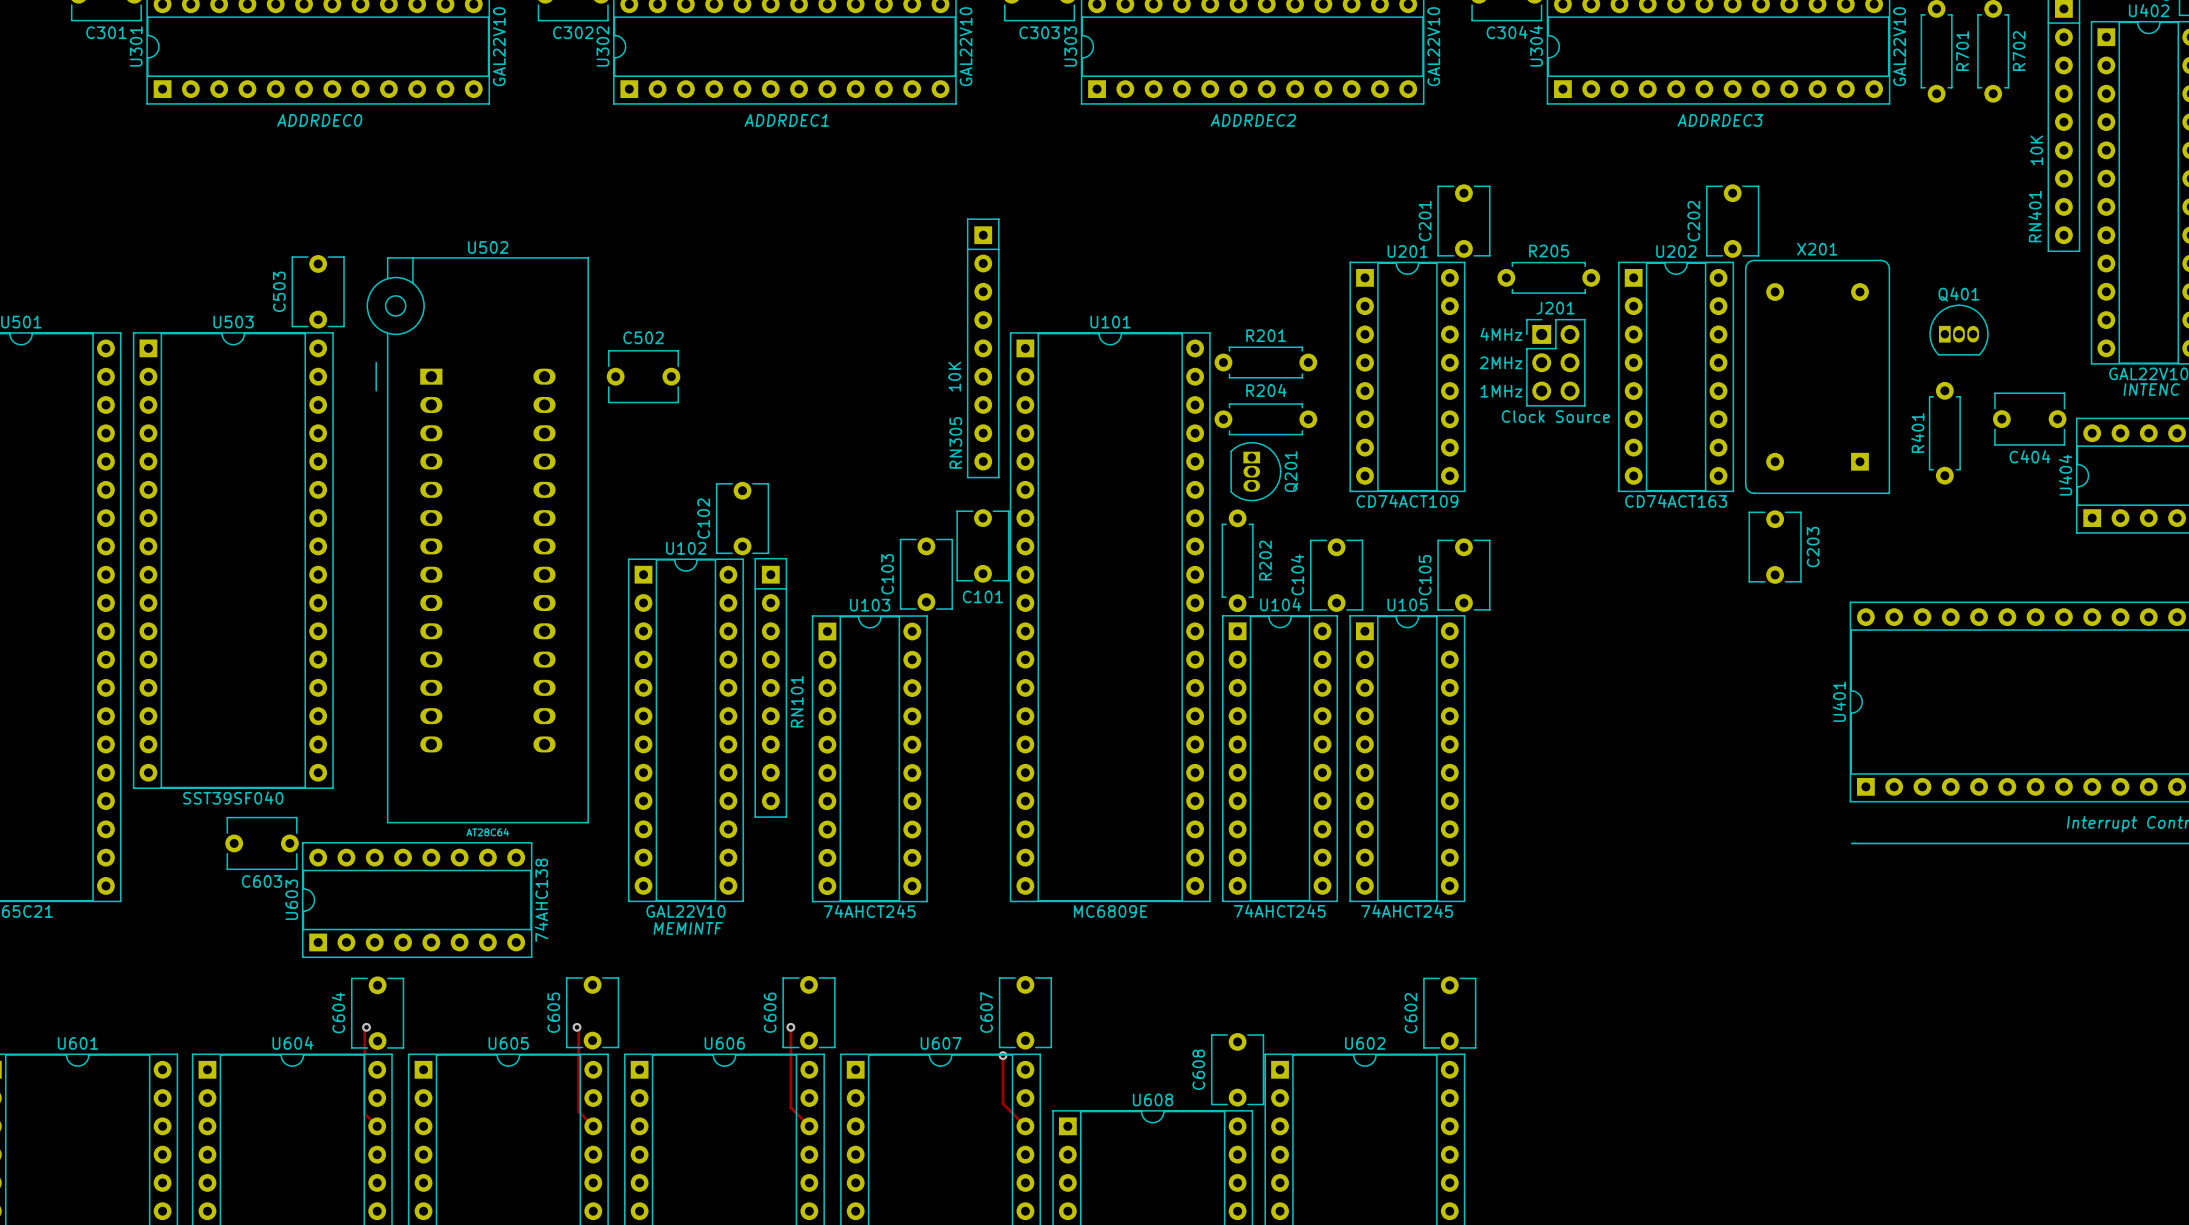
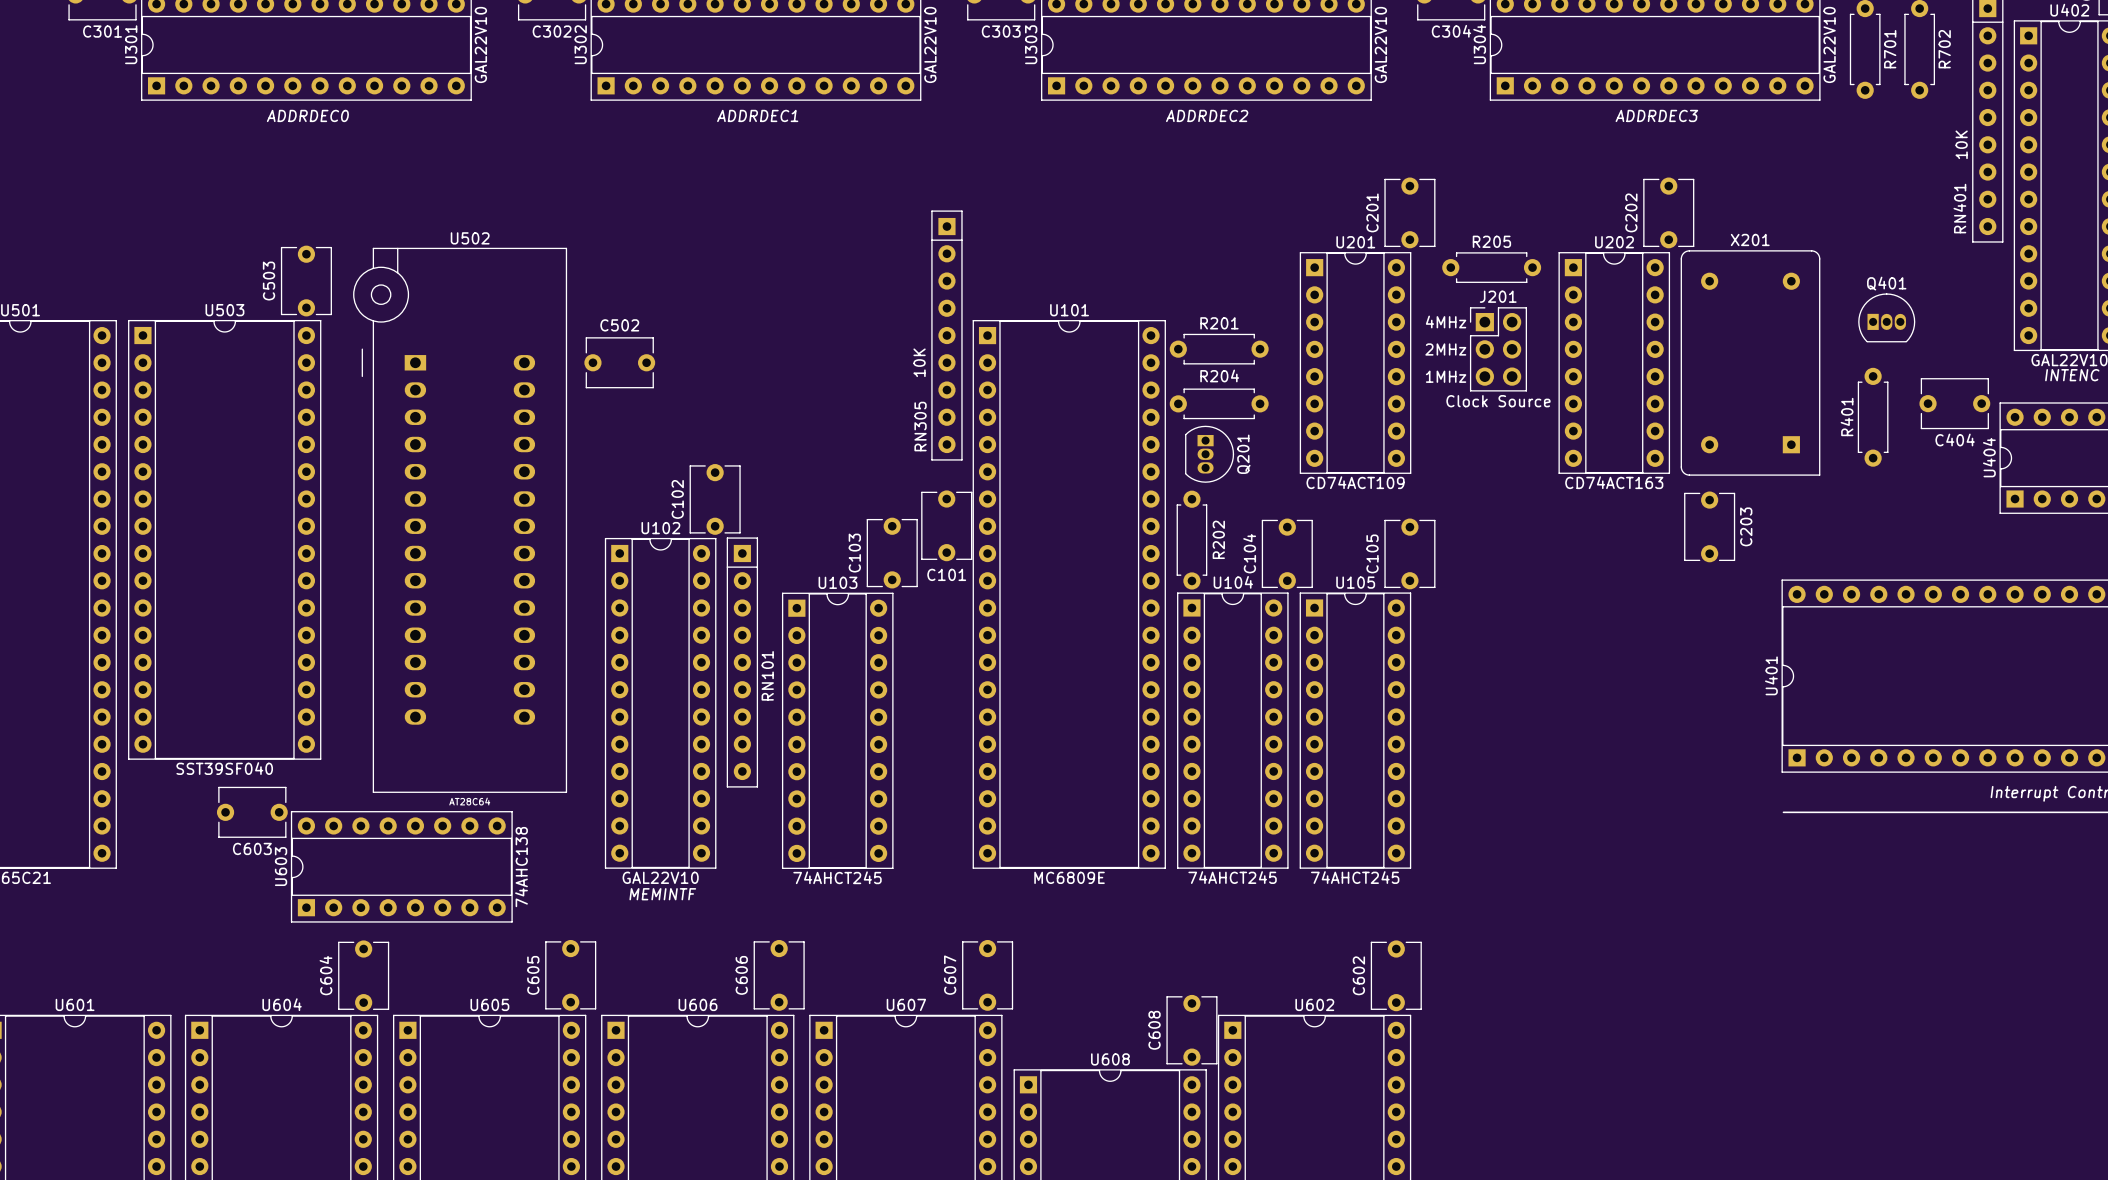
track: (366, 1027) (364, 1029) (364, 1113) (377, 1126) -> none
via: (366, 1027) -> none
track: (577, 1027) (578, 1028) (578, 1111) (593, 1126) -> none
via: (577, 1027) -> none
track: (790, 1027) (790, 1107) (809, 1126) -> none
via: (790, 1027) -> none
track: (1003, 1055) (1003, 1103) (1025, 1126) -> none
via: (1003, 1055) -> none

